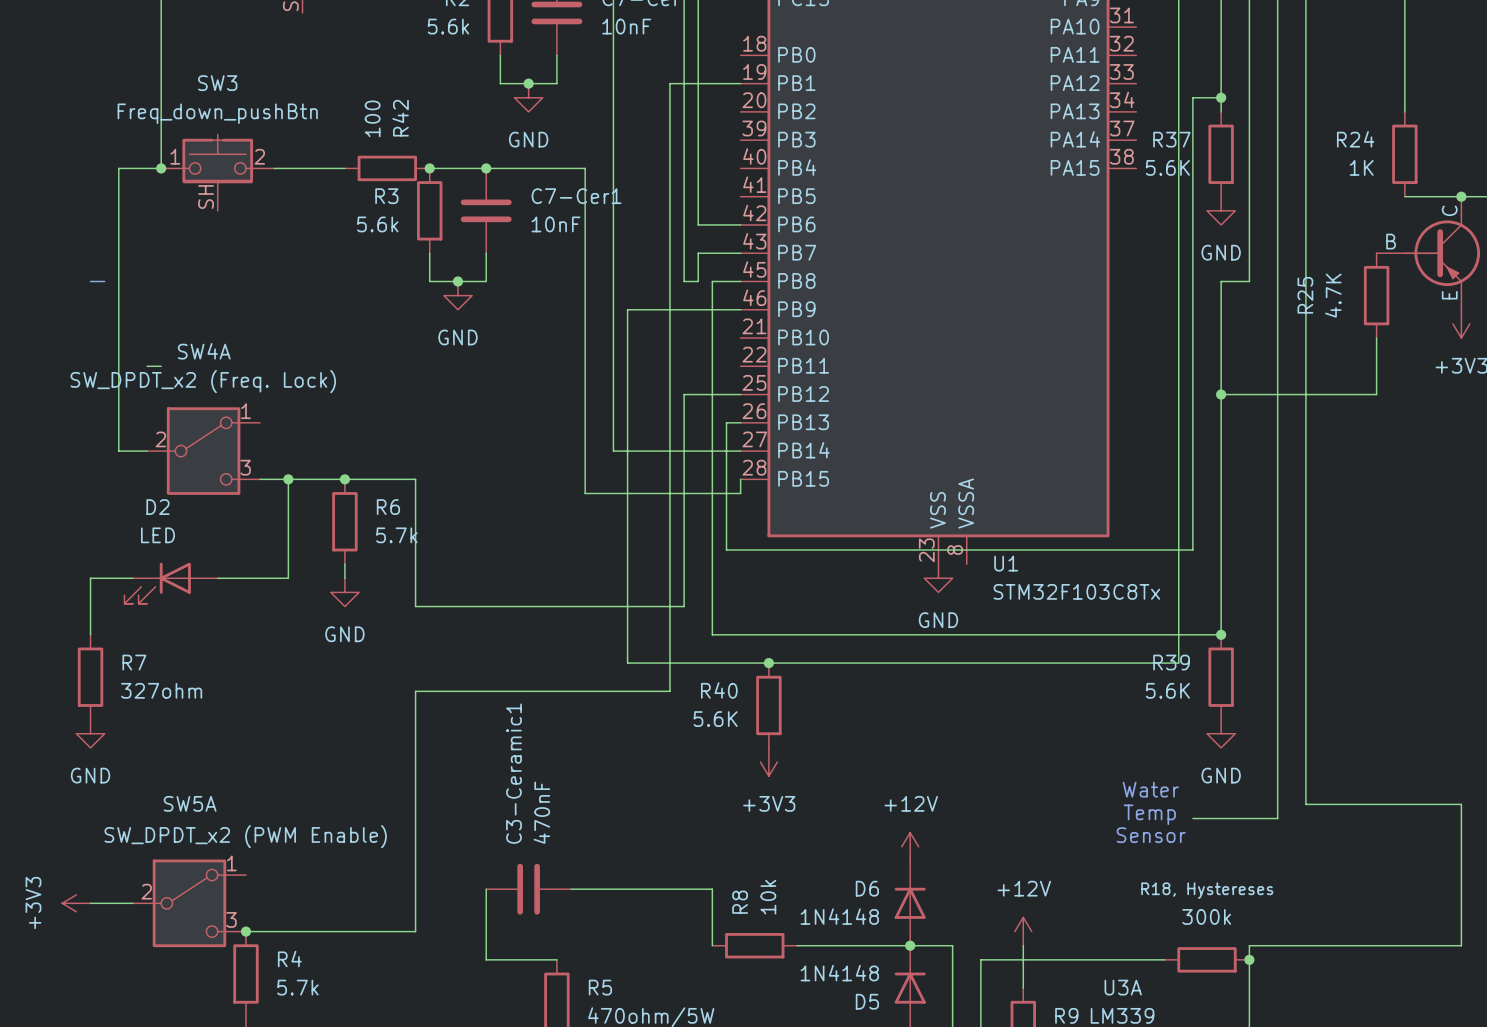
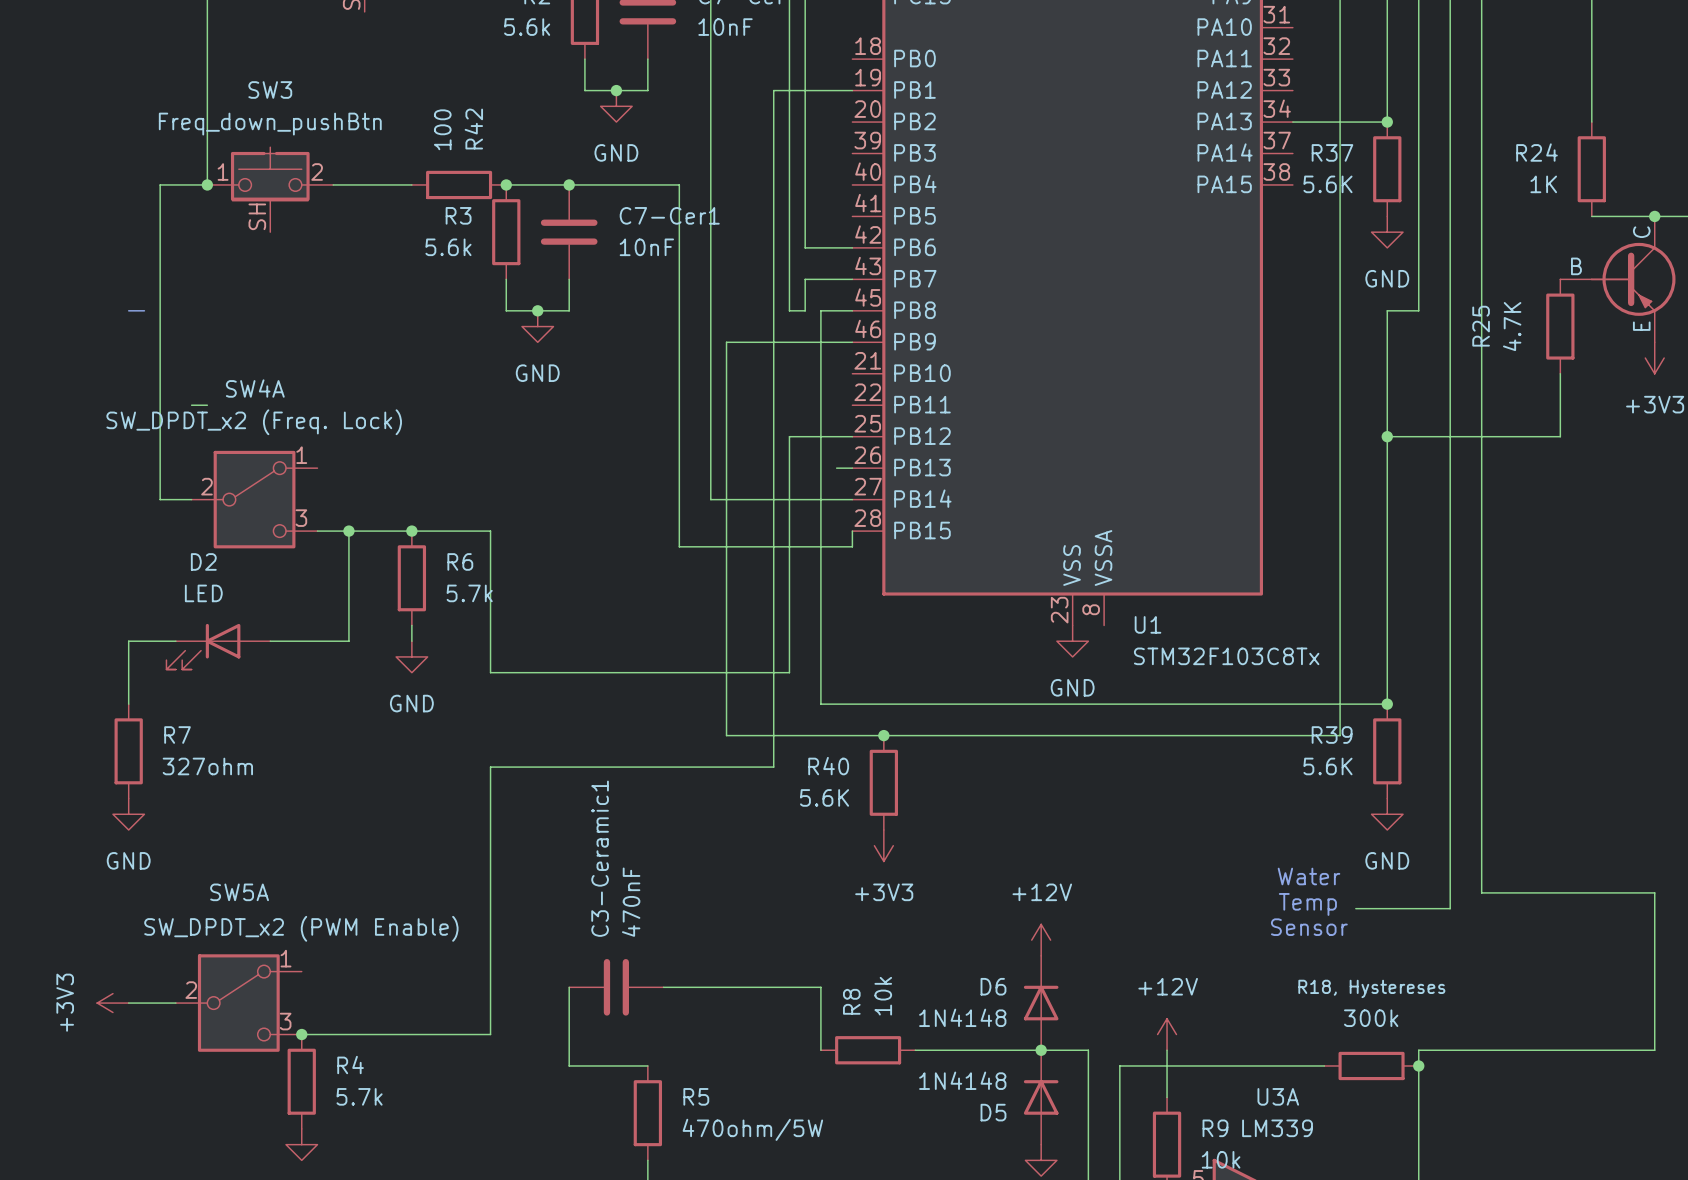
wire: (1221, 97) (1192, 97) (1192, 550) (726, 550) (726, 422) -> none
junction position: (1221, 97) -> (1387, 122)
wire: none -> (1292, 122) (1387, 122)

